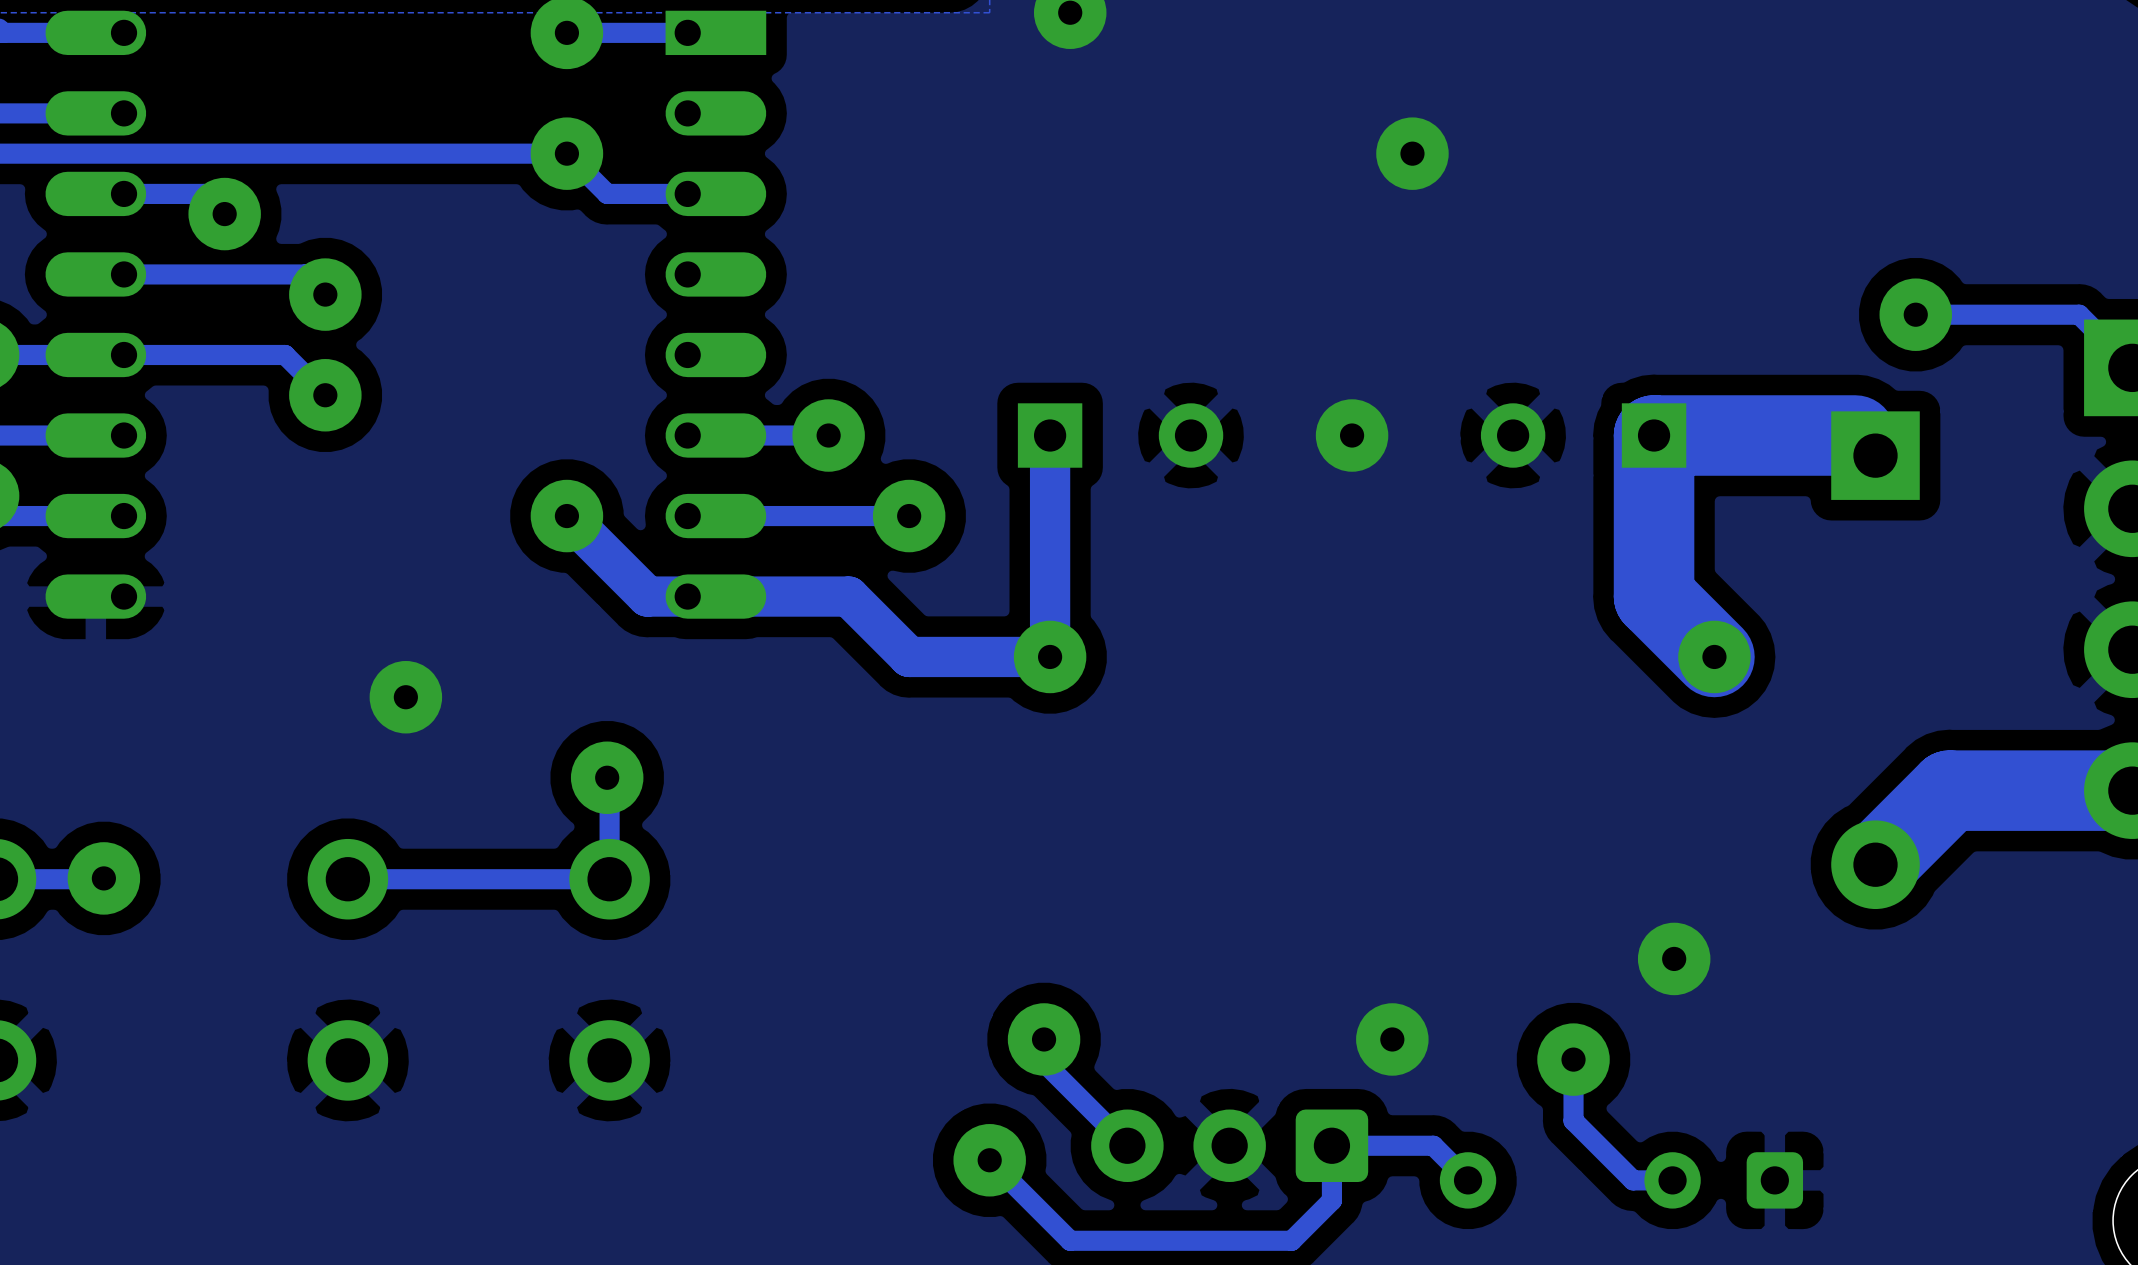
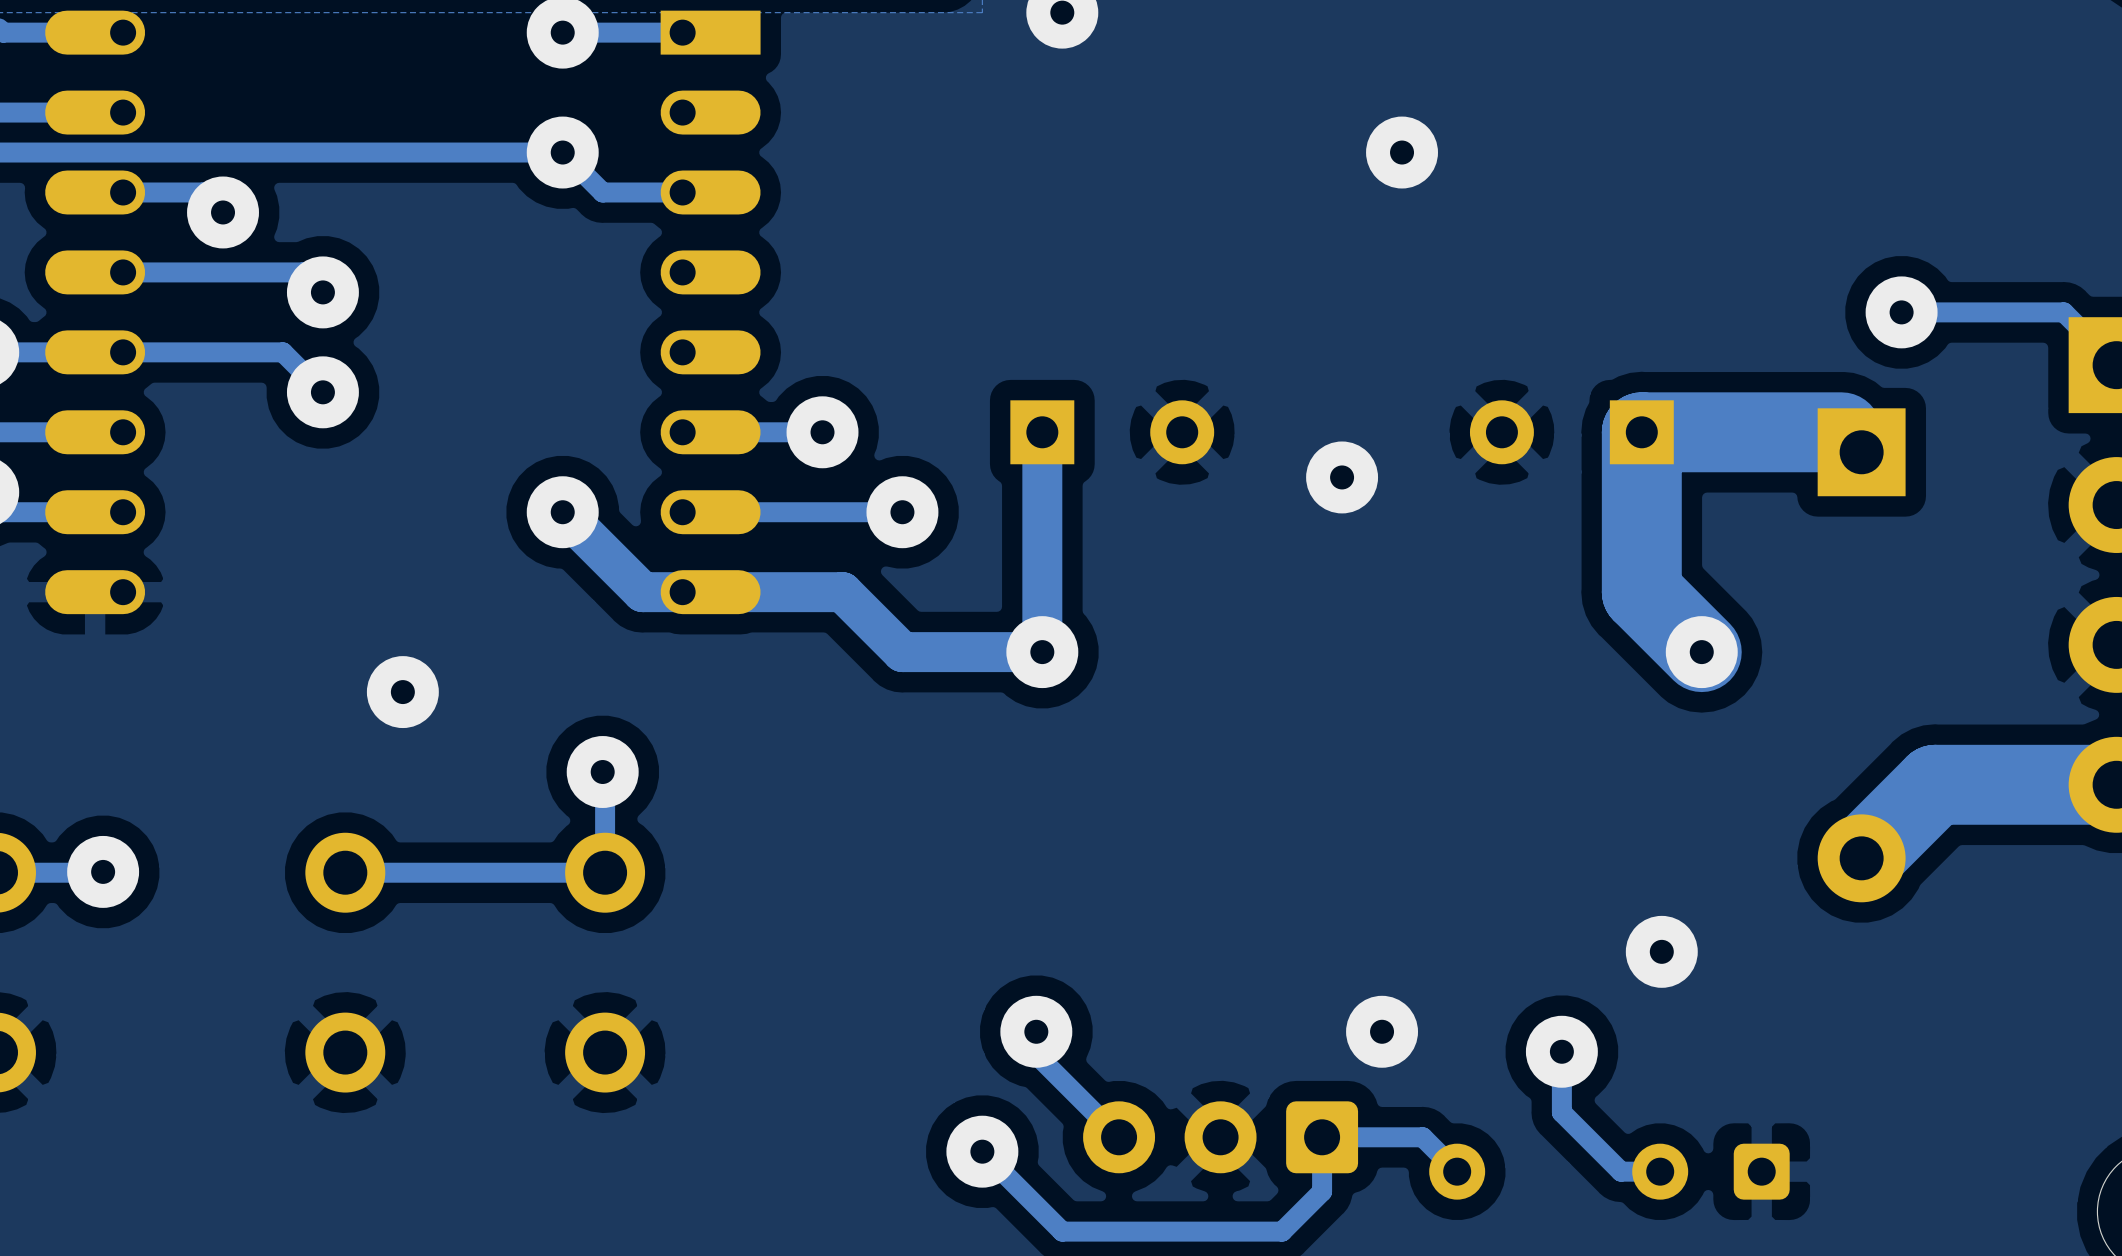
via position: (1352, 435) -> (1342, 477)

